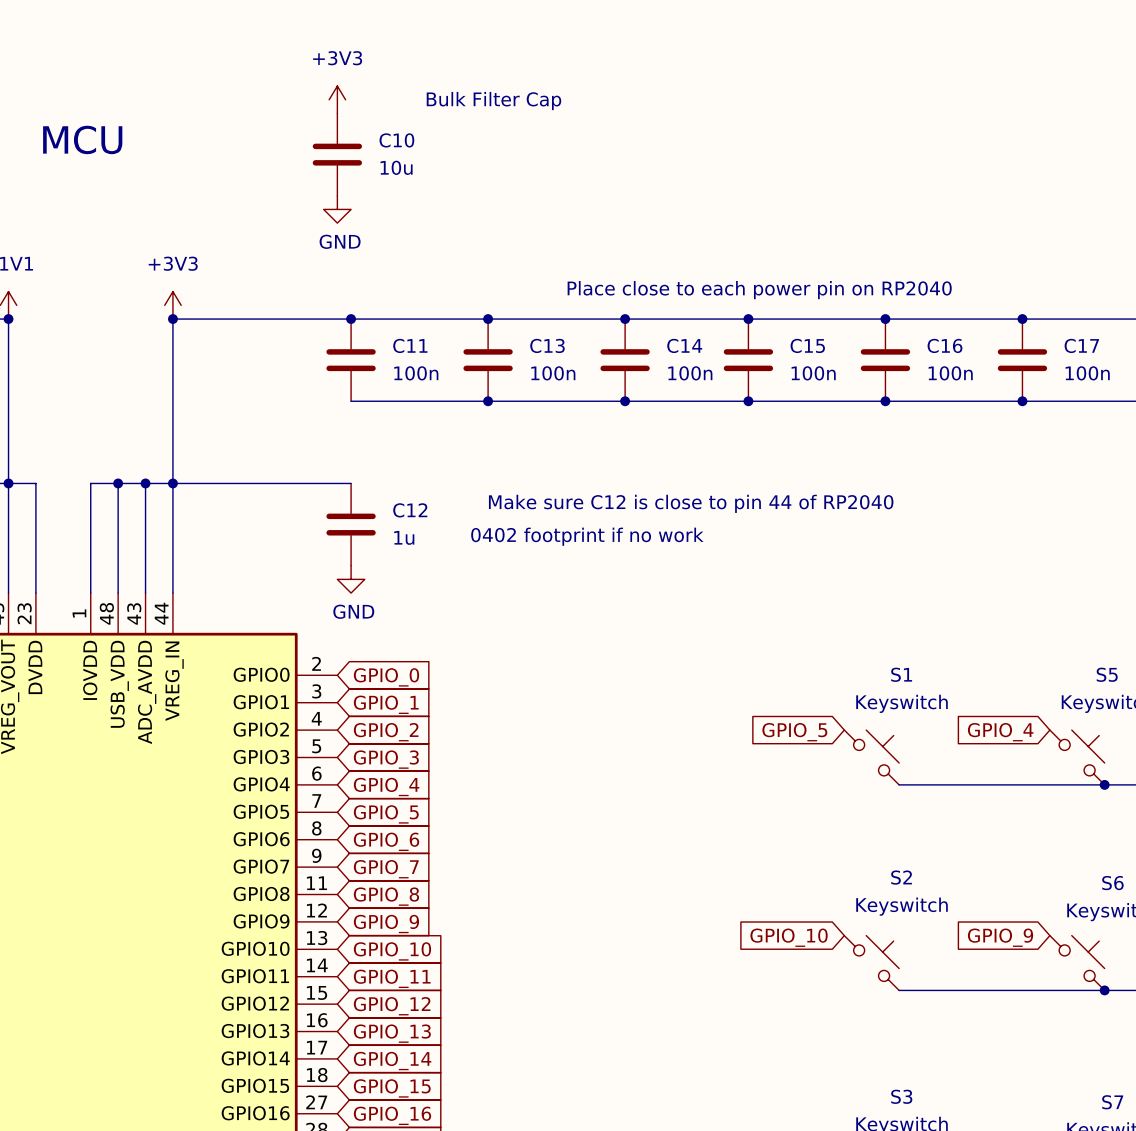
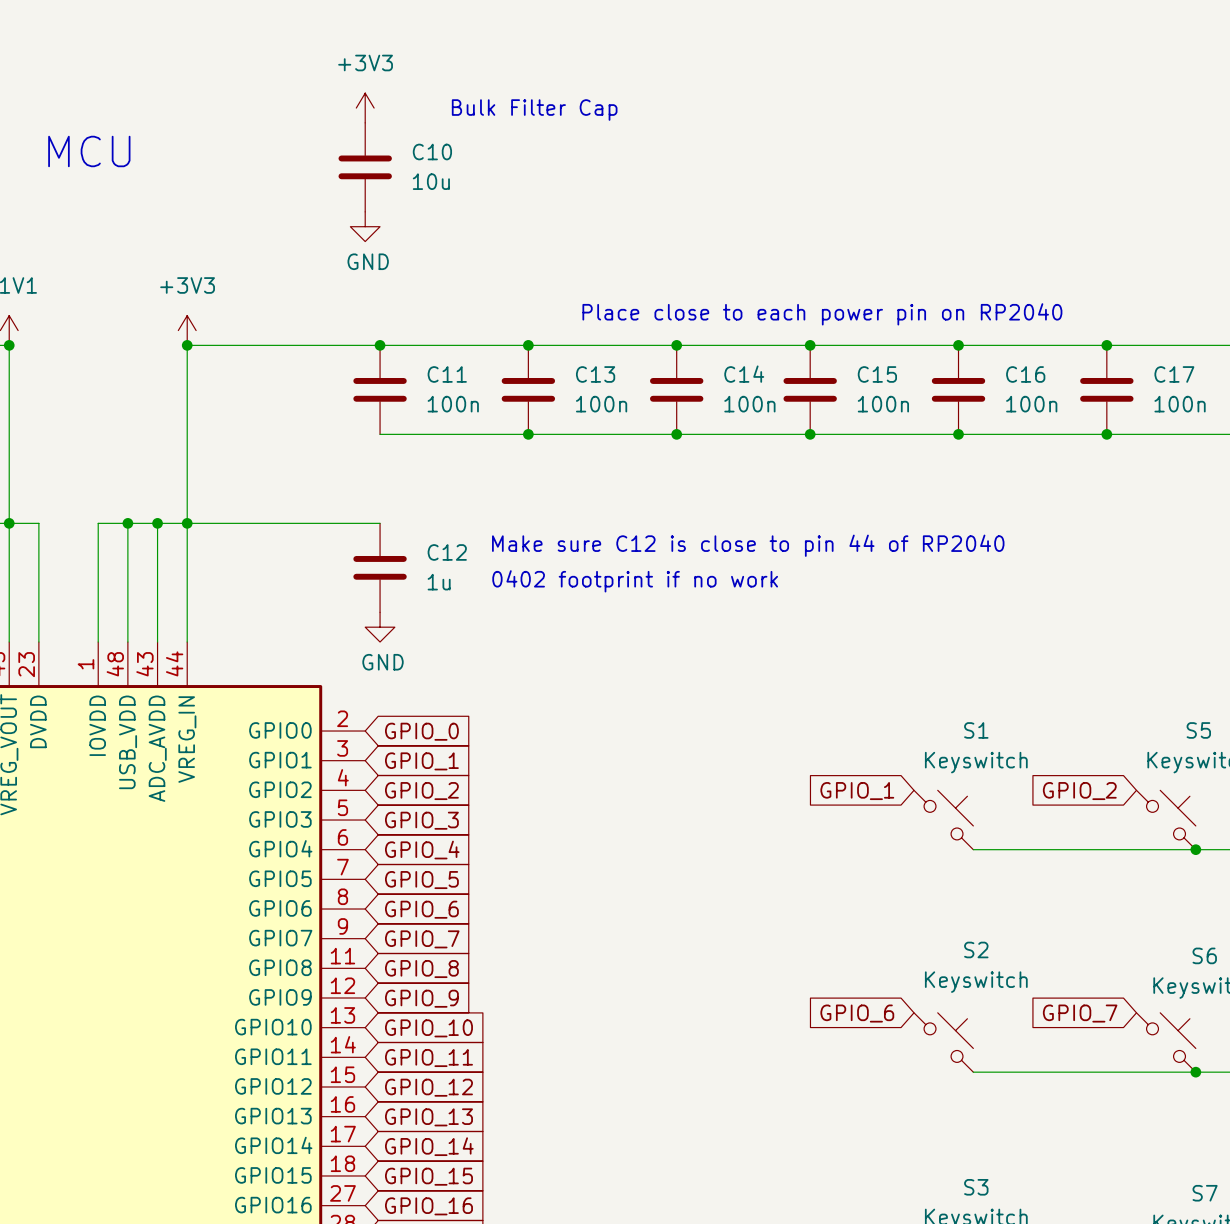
global label: GPIO_5 (794, 732) -> GPIO_1 (857, 791)
global label: GPIO_4 (1000, 732) -> GPIO_2 (1079, 791)
global label: GPIO_10 (789, 937) -> GPIO_6 (857, 1013)
global label: GPIO_9 (1000, 937) -> GPIO_7 (1080, 1013)

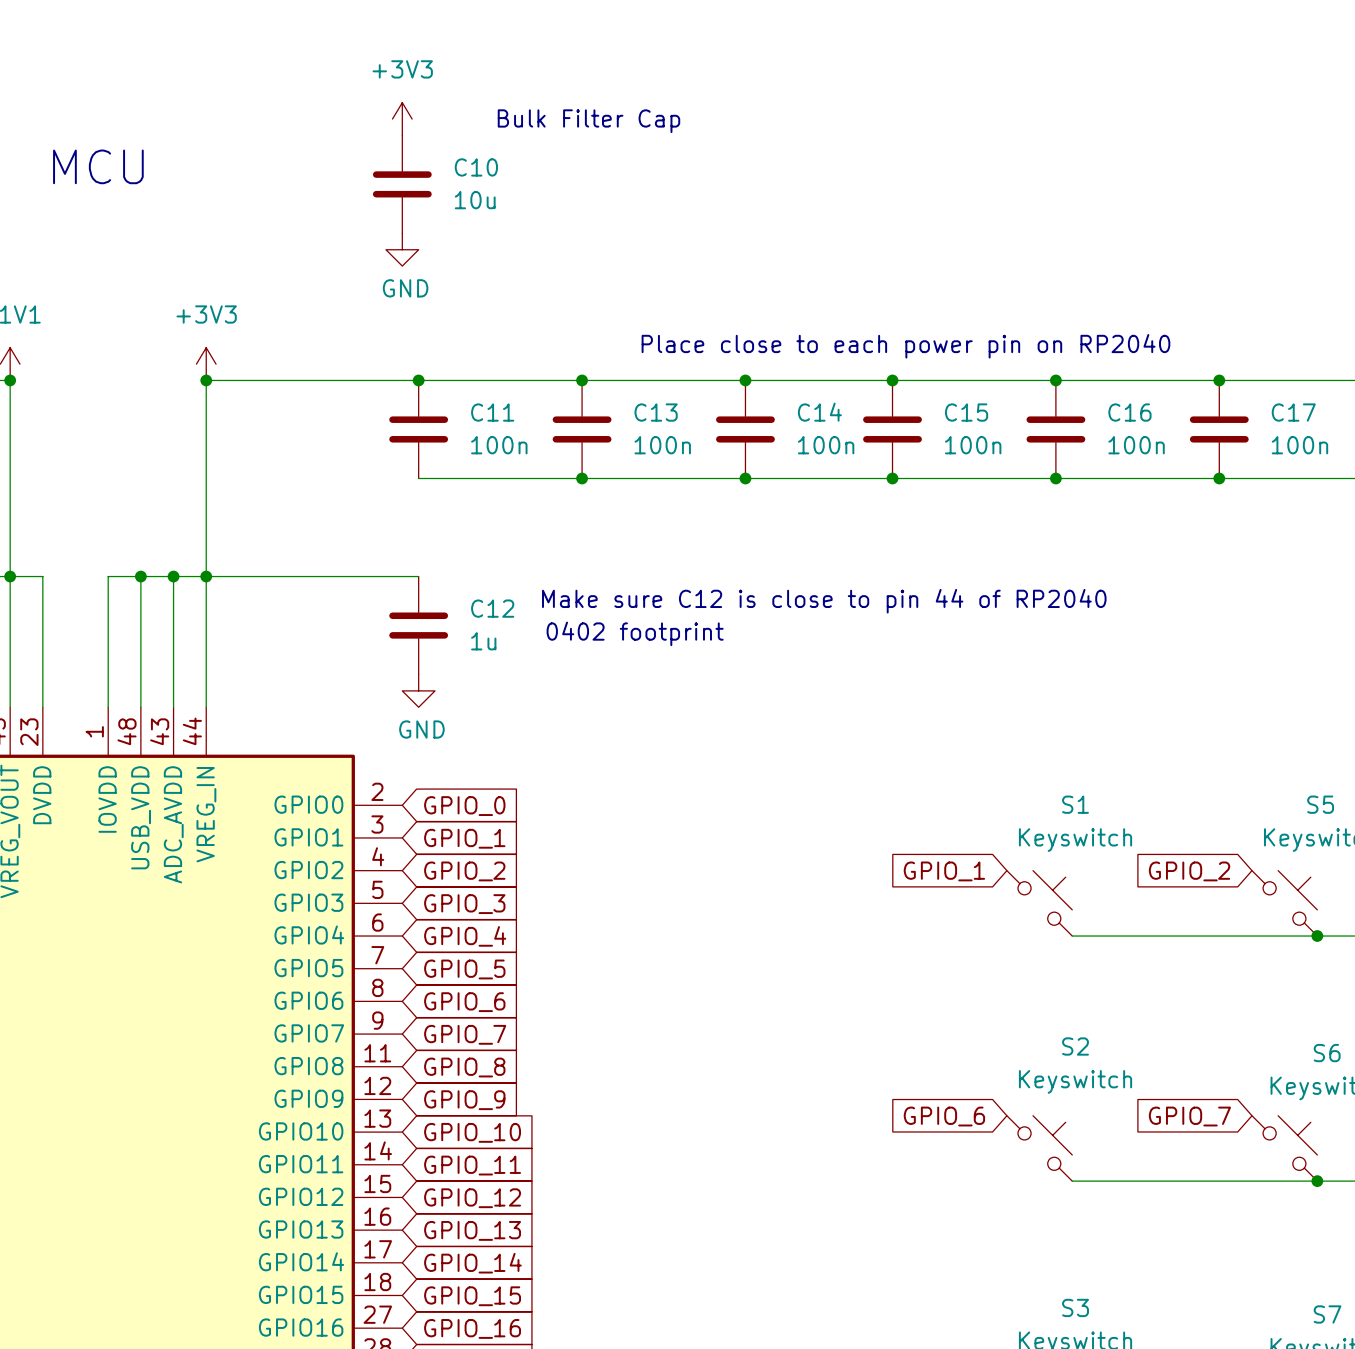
text: 0402 footprint if no work (635, 581) -> 0402 footprint (635, 633)

